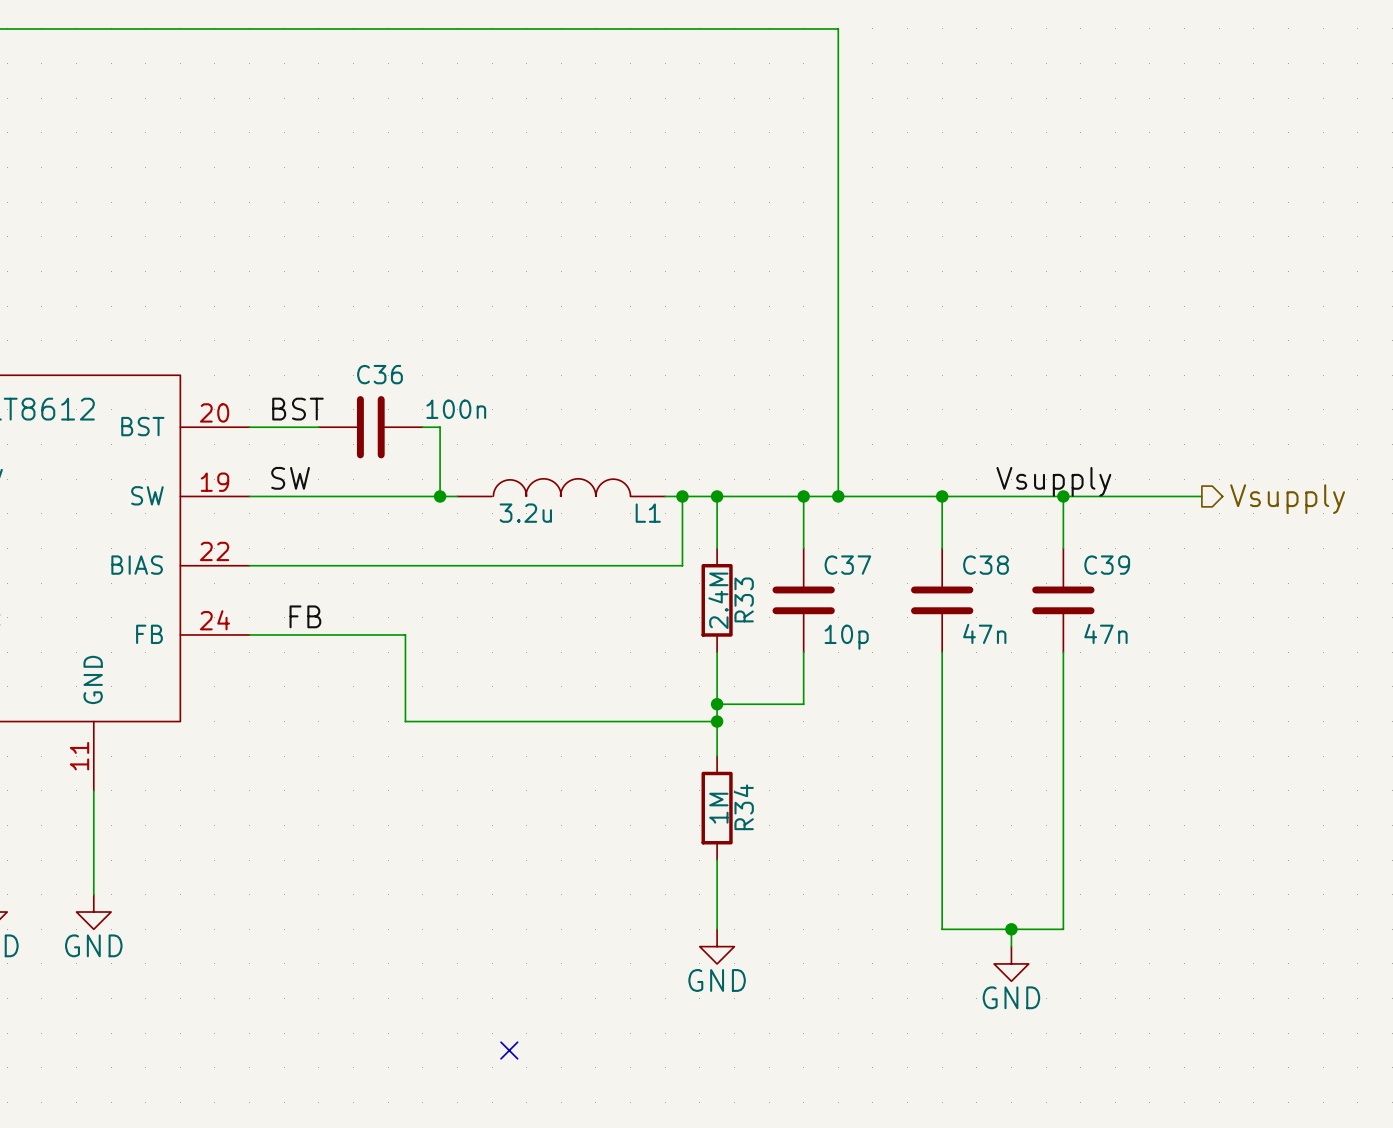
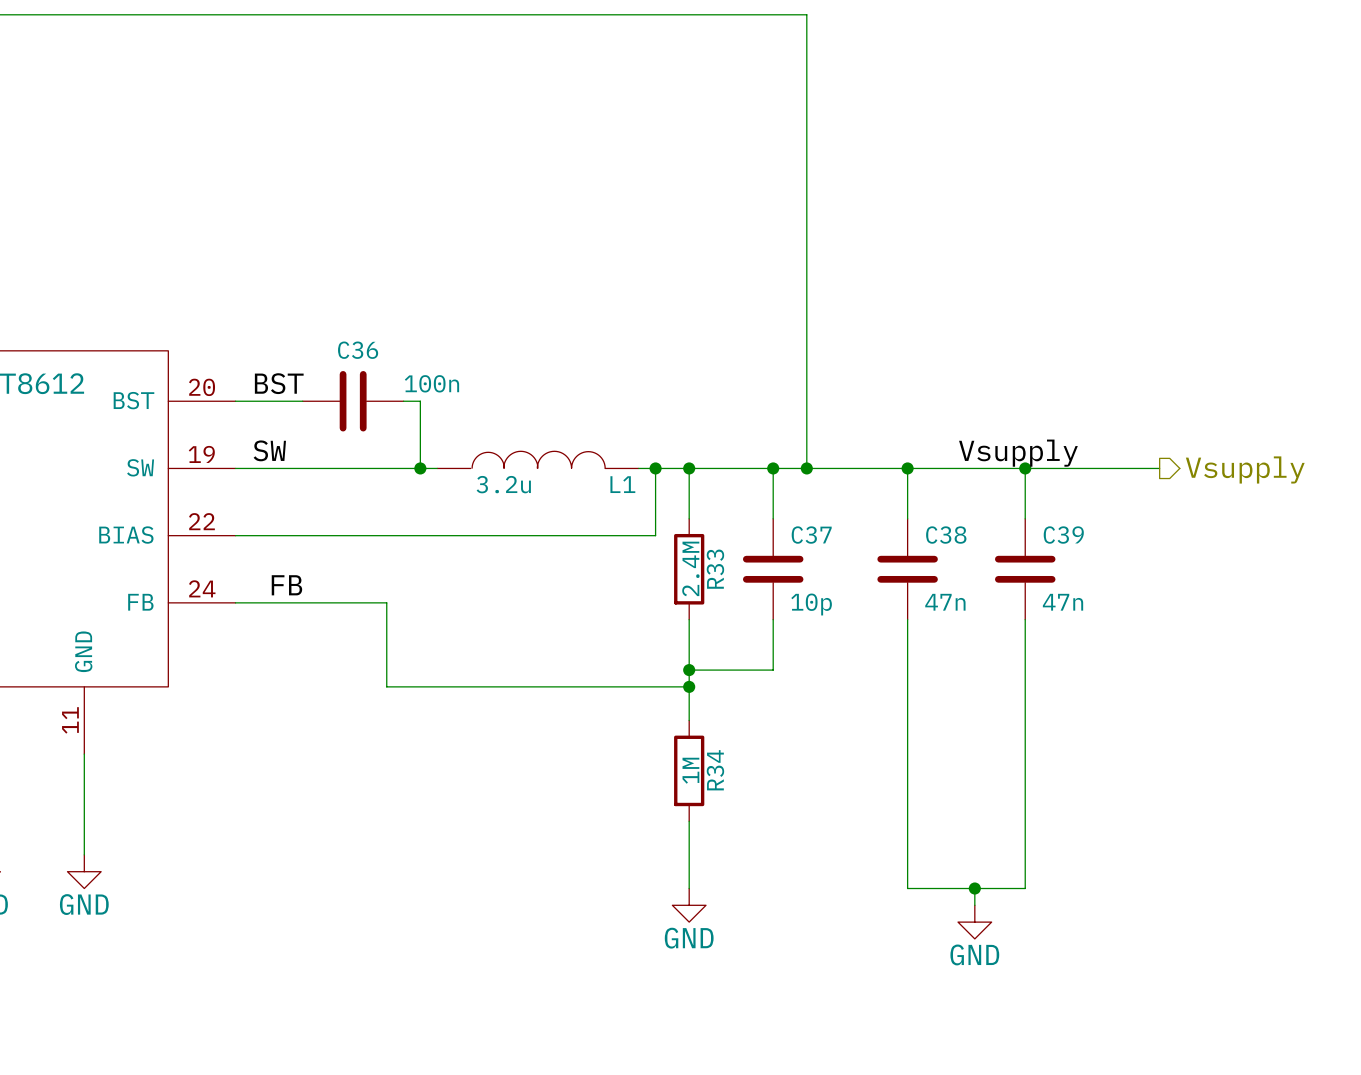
no-connect mark: (509, 1050) -> none

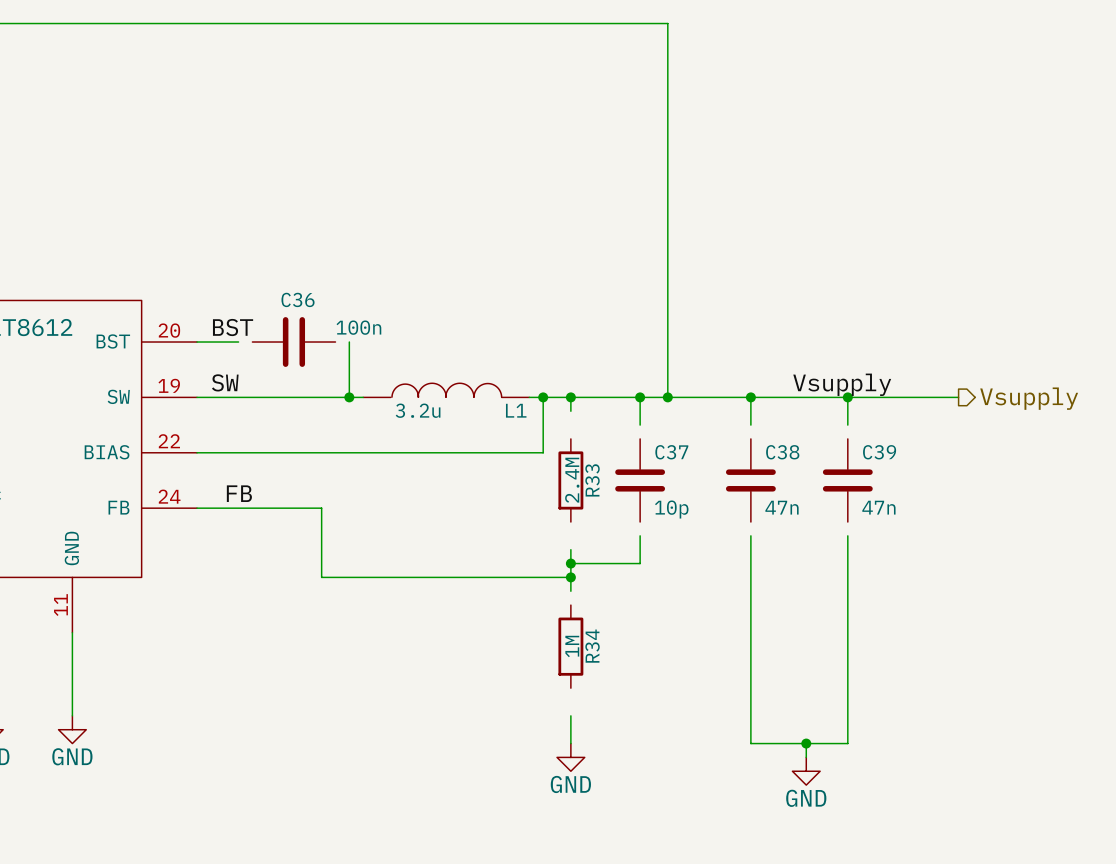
wire: (285, 401) (302, 401) -> none
wire: (403, 401) (420, 401) -> none
wire: (689, 485) (689, 518) -> none
wire: (773, 502) (773, 518) -> none
wire: (907, 502) (907, 518) -> none
wire: (1025, 502) (1025, 518) -> none
wire: (689, 619) (689, 653) -> none
wire: (773, 619) (773, 636) -> none
wire: (907, 619) (907, 636) -> none
wire: (1025, 619) (1025, 636) -> none
wire: (689, 703) (689, 720) -> none
wire: (689, 821) (689, 854) -> none

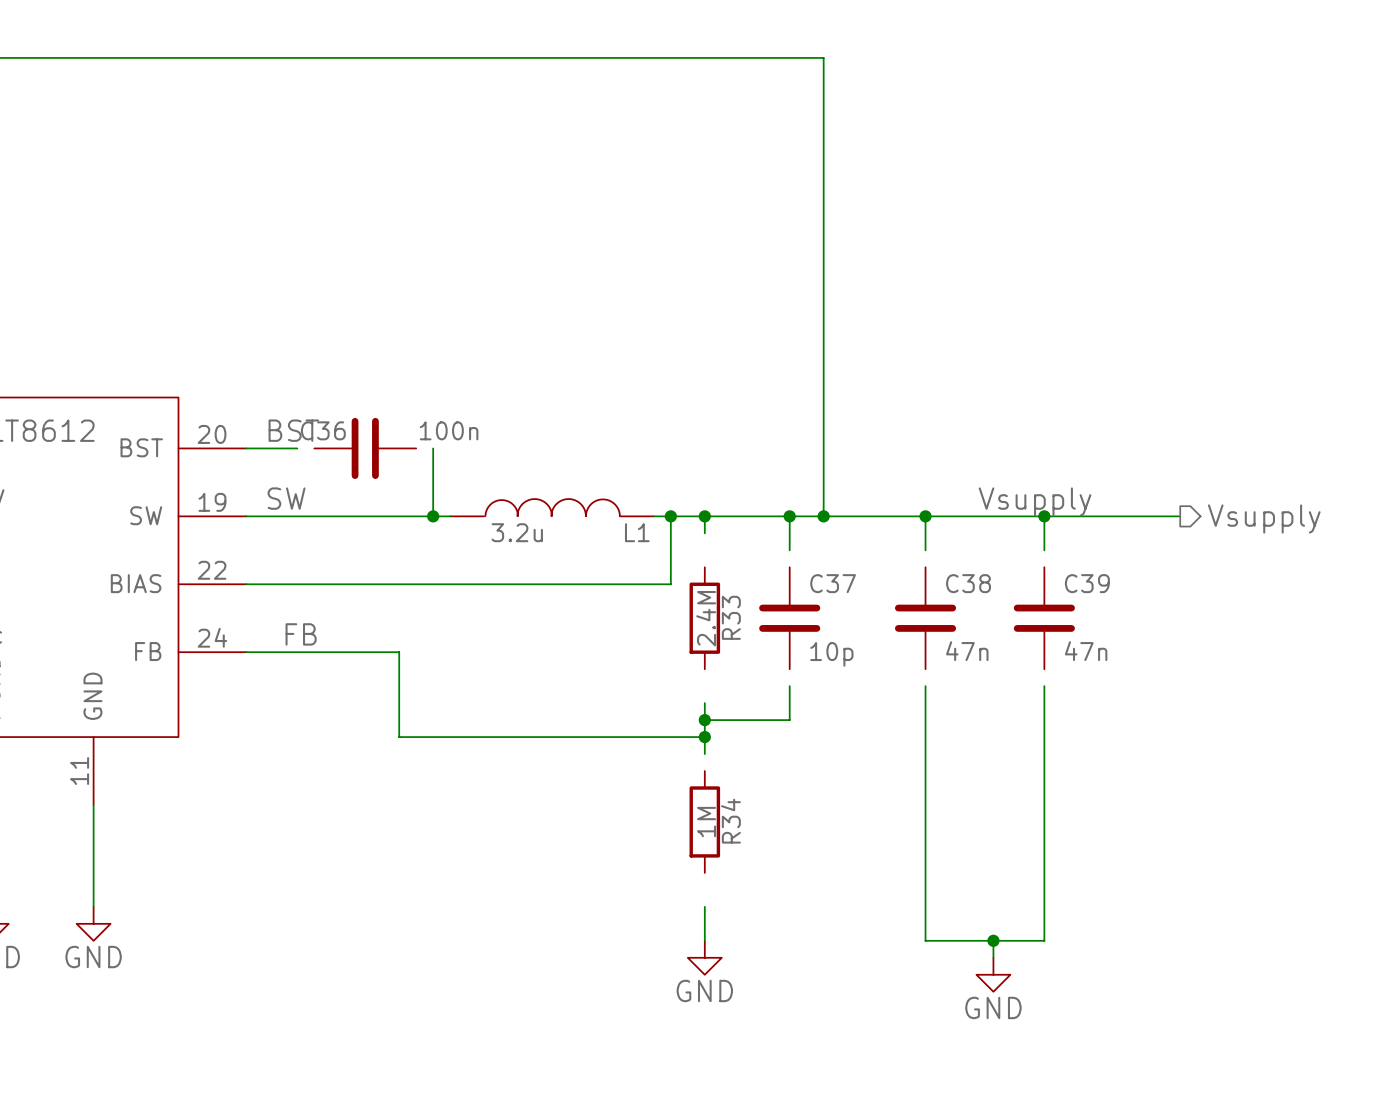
C36 name position: C36 (298, 299) -> C36 (323, 430)

